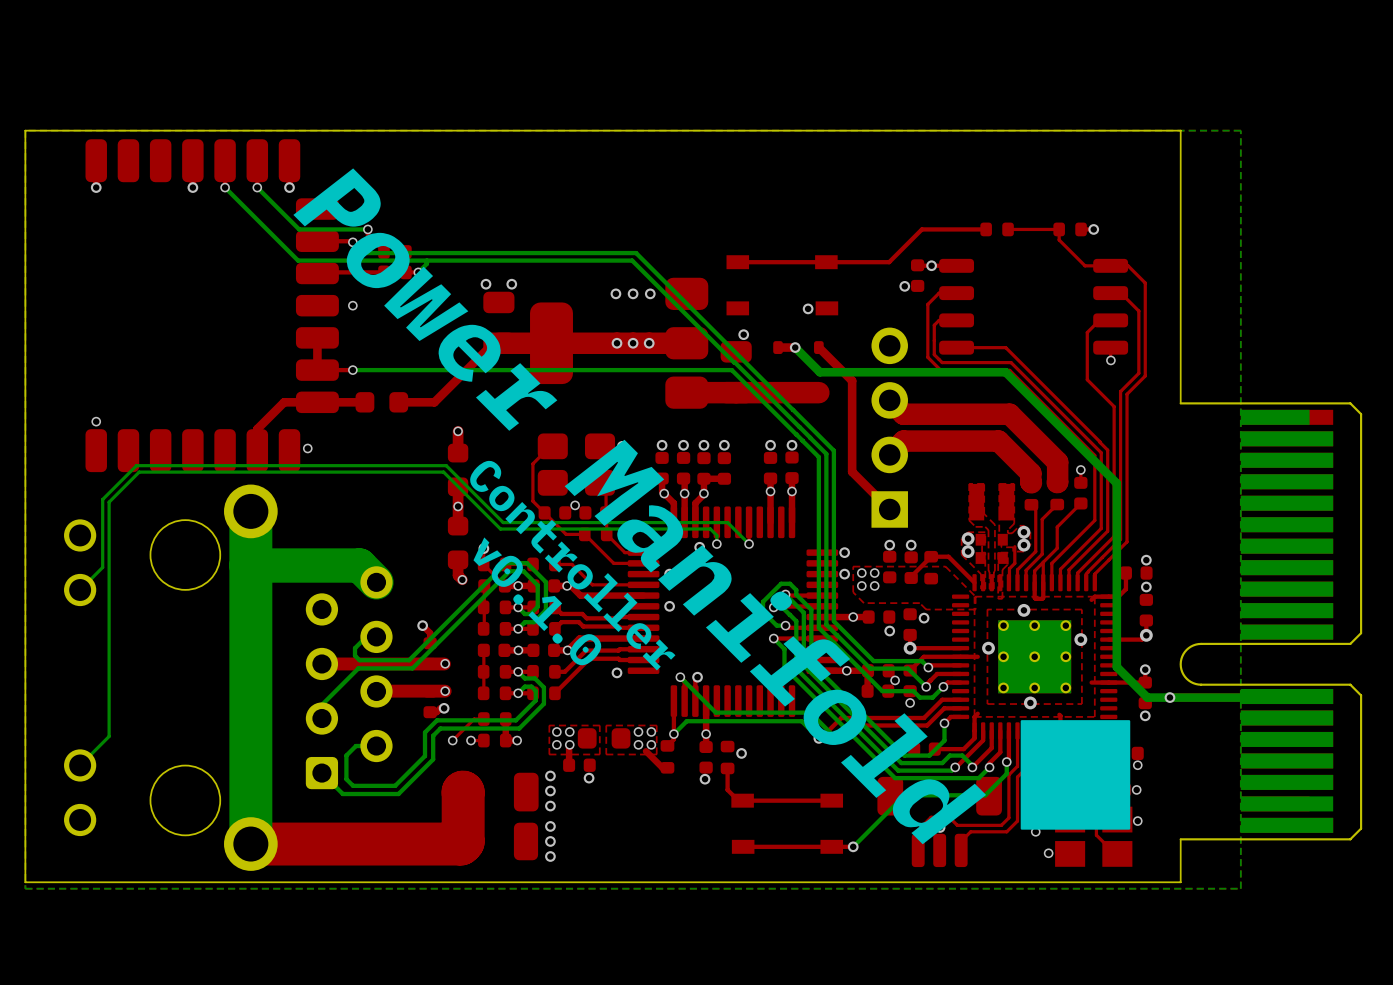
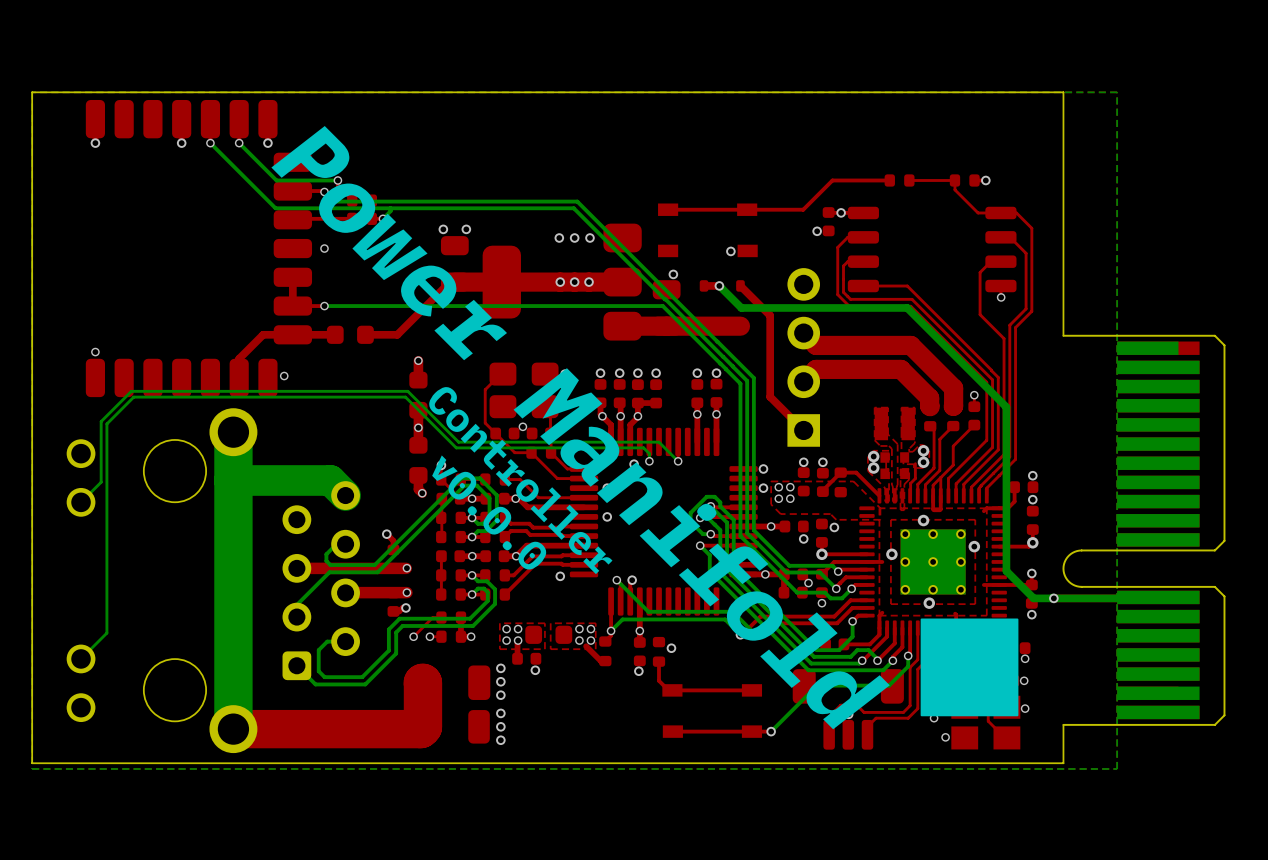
text: v0.1.0 (537, 601) -> v0.0.0 (489, 512)

